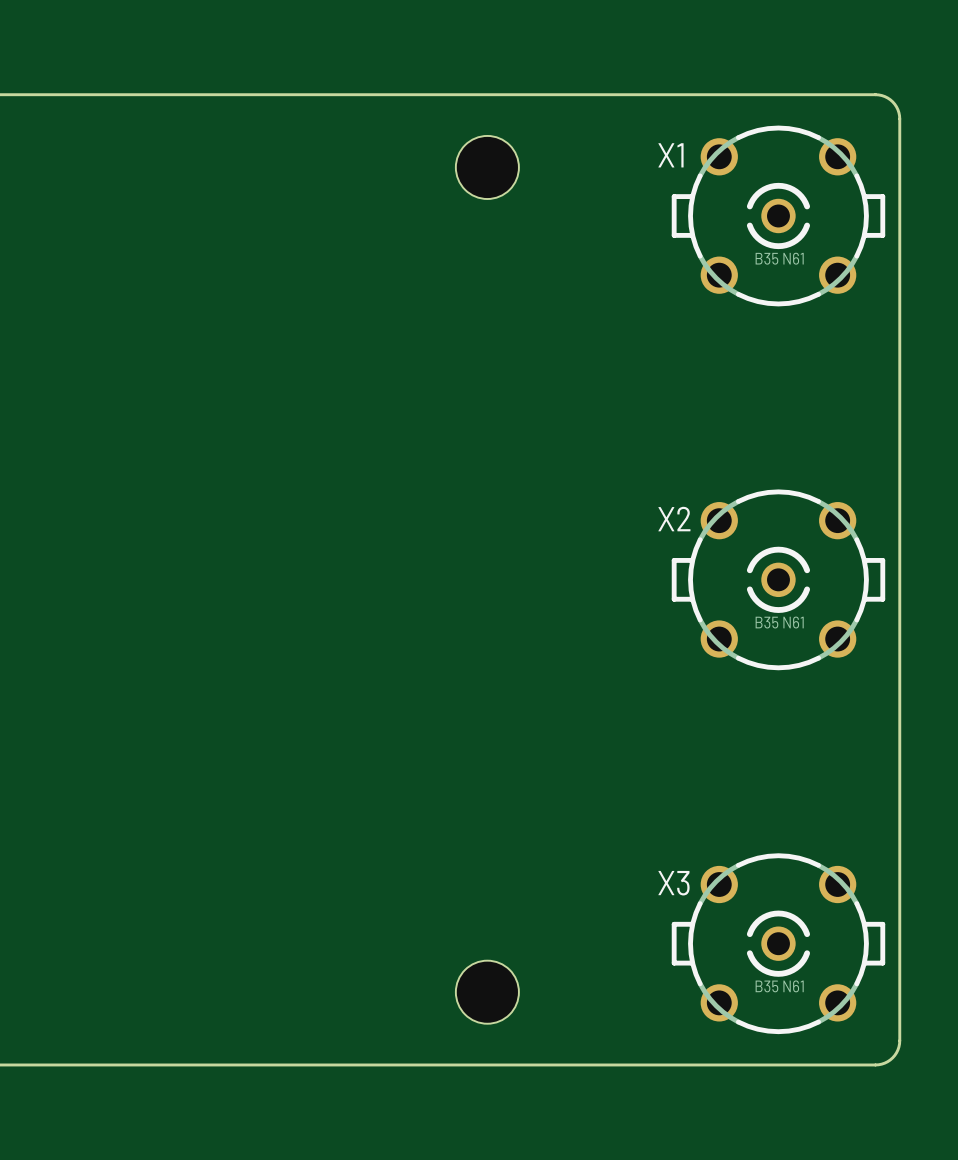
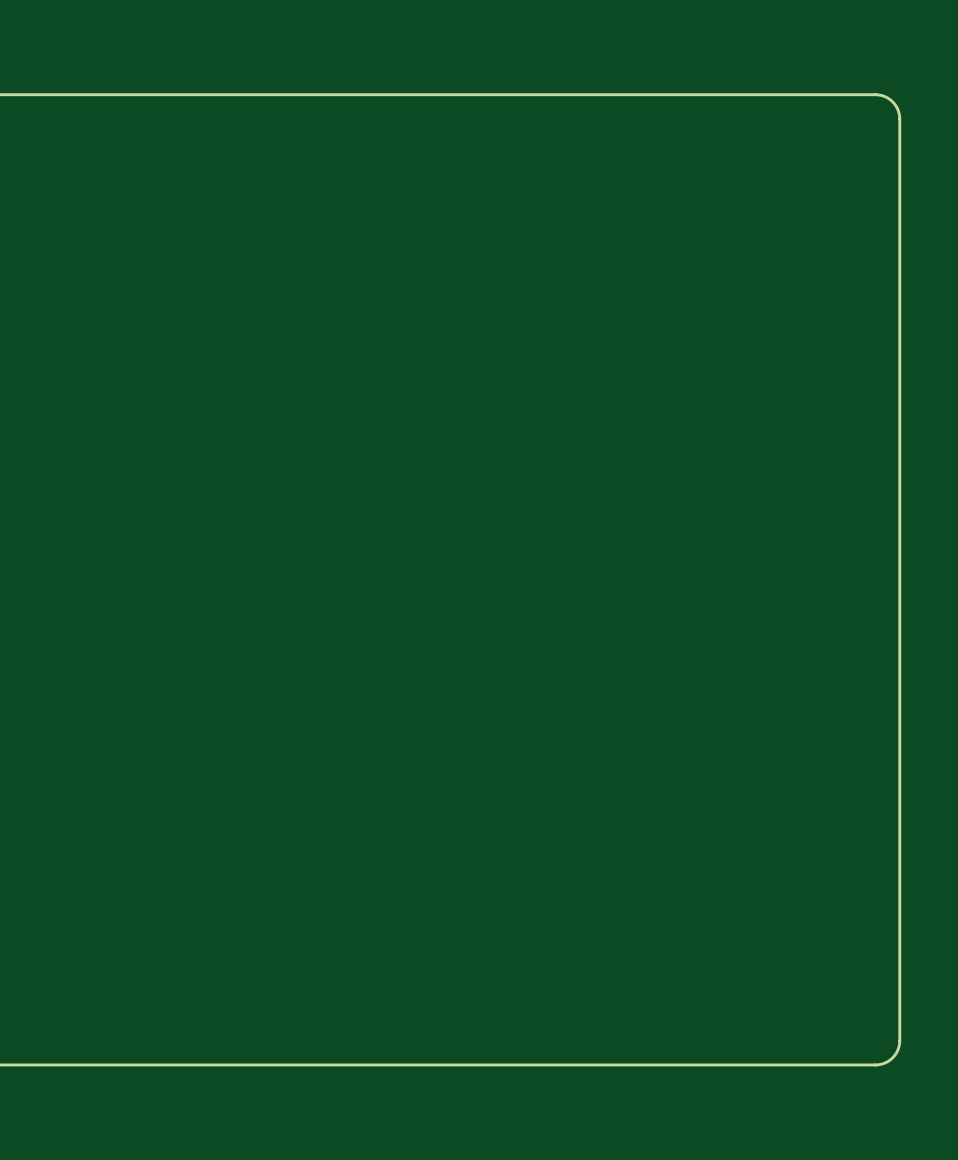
part: (487, 167) -> none
X1: (778, 215) -> none
X2: (778, 579) -> none
X3: (778, 943) -> none
part: (487, 992) -> none

